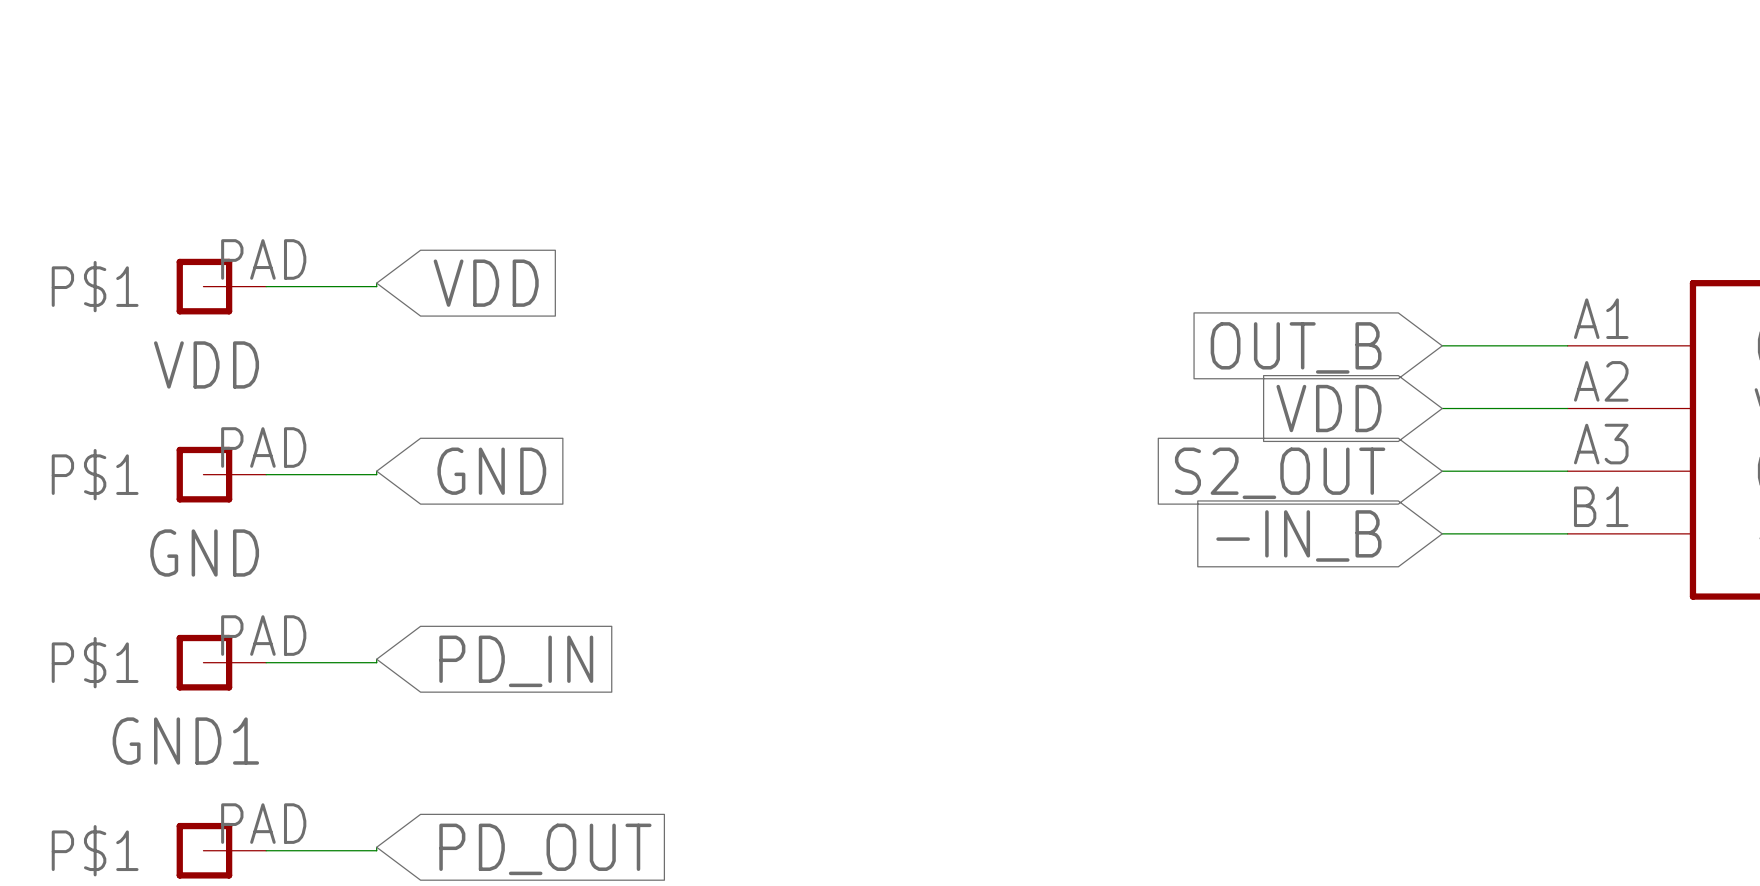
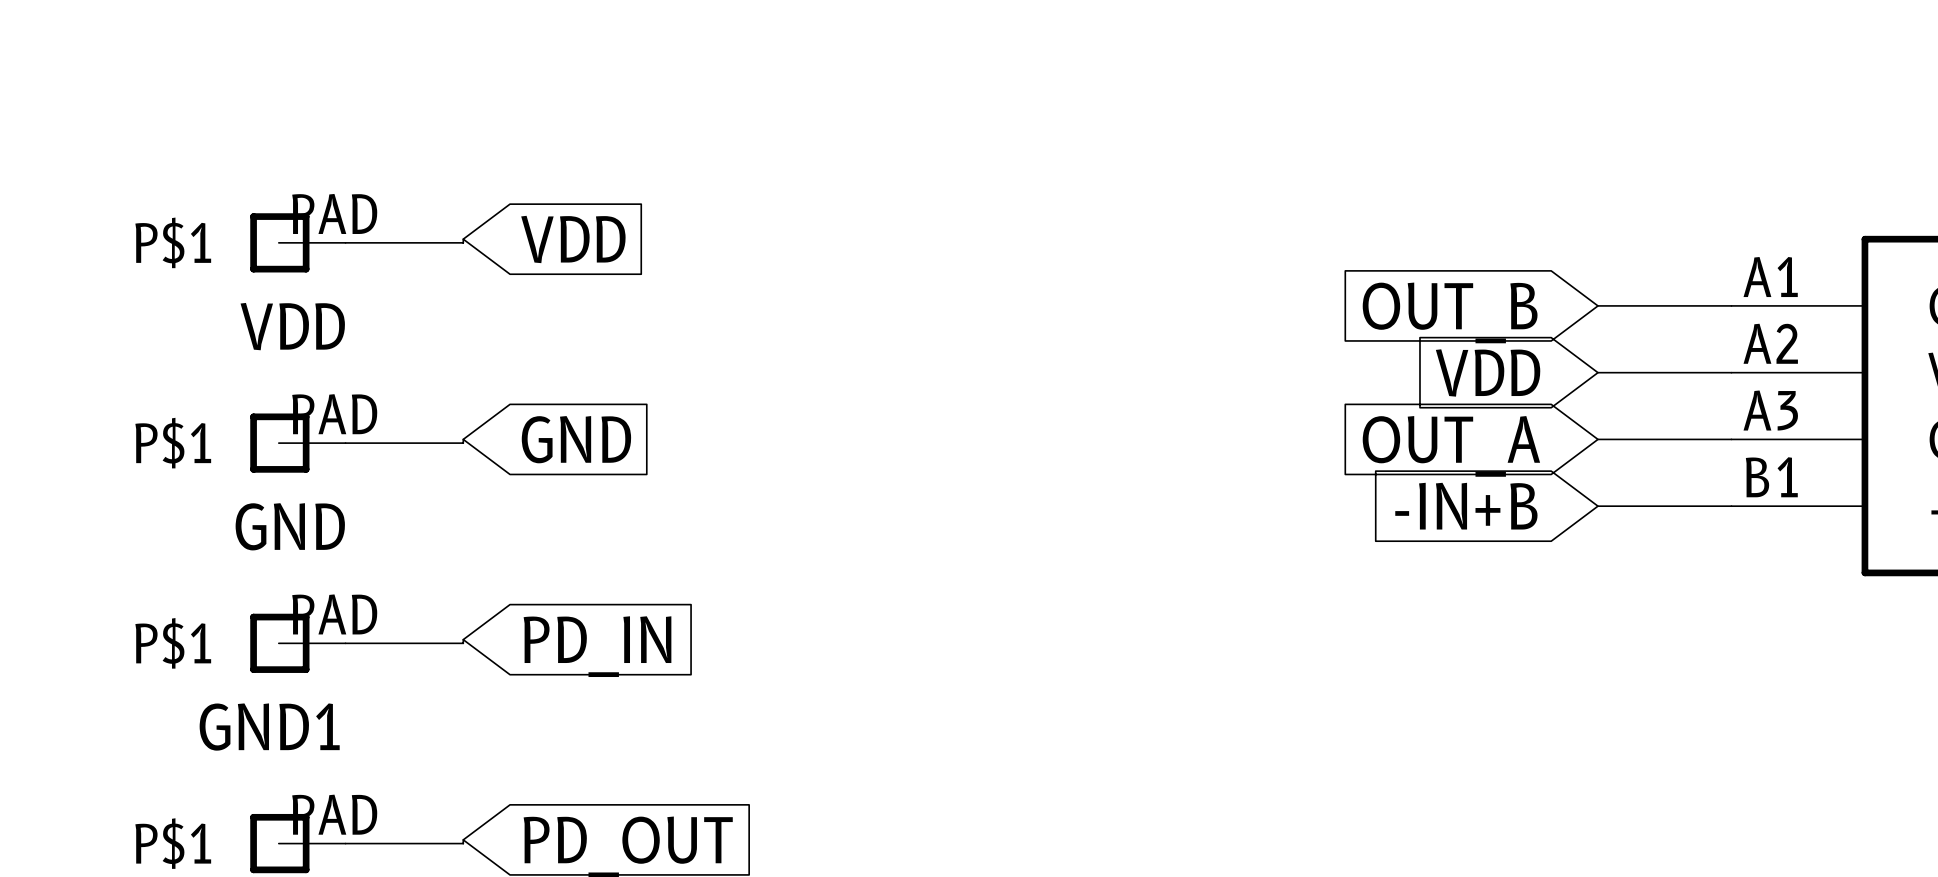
global label: S2_OUT (1280, 473) -> OUT_A (1451, 446)
global label: -IN_B (1298, 535) -> -IN+B (1466, 506)

